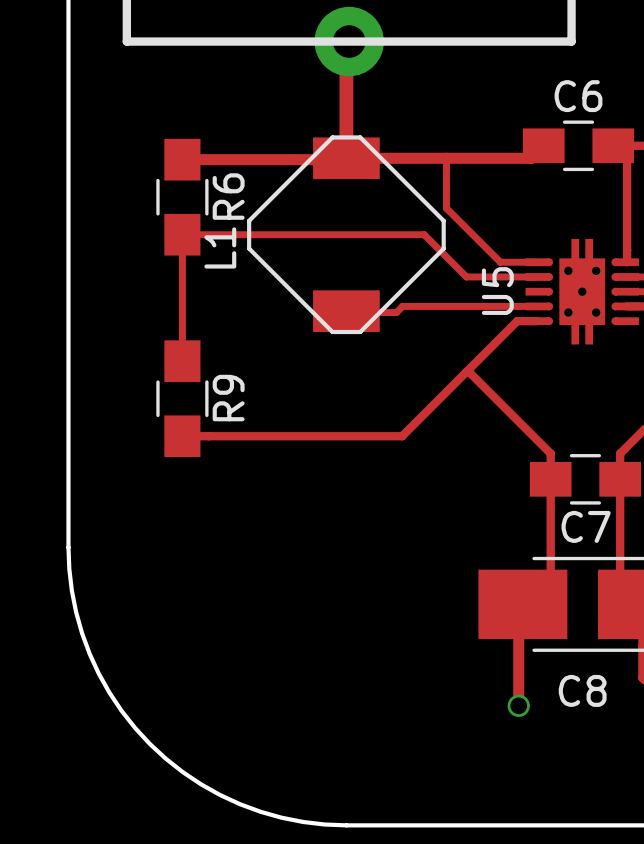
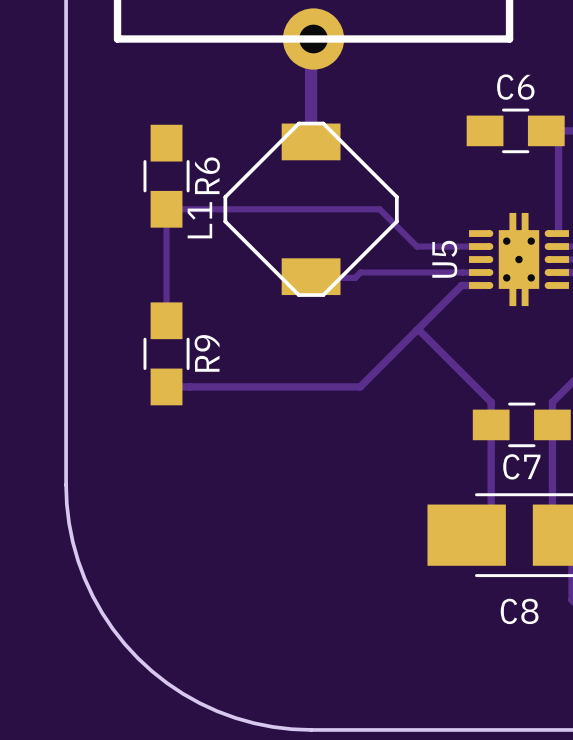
track: (543, 145) (531, 158) (182, 159) -> none
track: (446, 158) (446, 208) (500, 262) (537, 262) -> none
track: (522, 604) (518, 608) (518, 705) -> none
via: (518, 705) -> none

